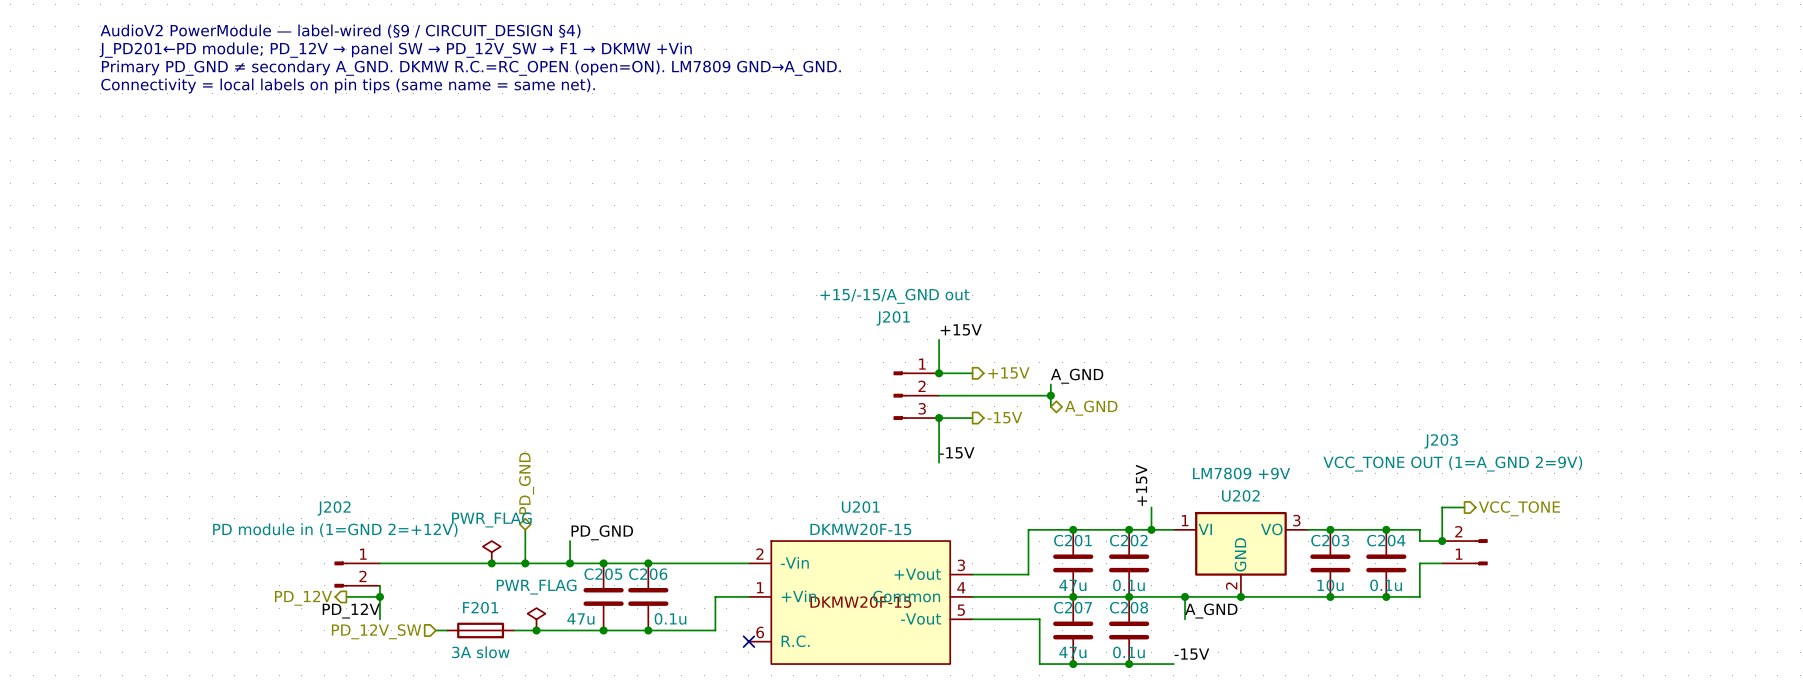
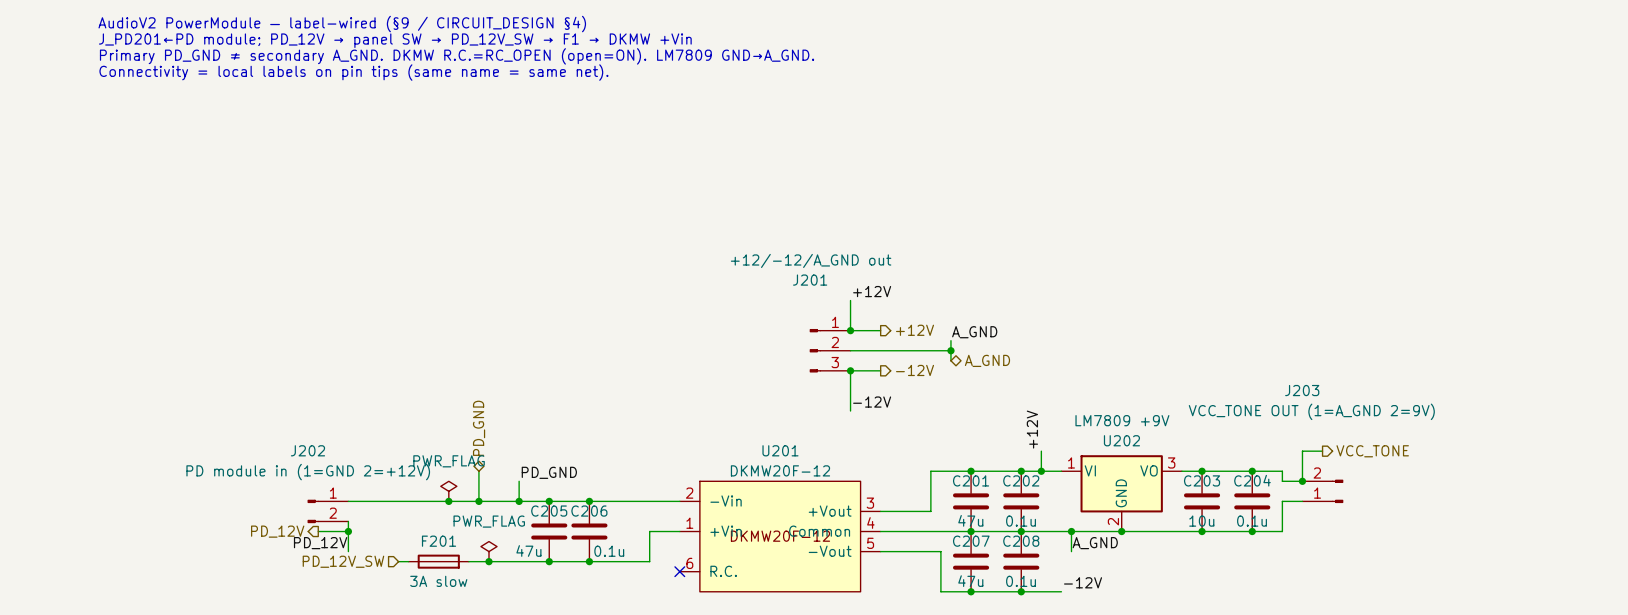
J201 value: +15/-15/A_GND out (894, 296) -> +12/-12/A_GND out (811, 260)
label: +15V (961, 329) -> +12V (872, 291)
hierarchical label: +15V (1008, 373) -> +12V (915, 330)
hierarchical label: -15V (1004, 417) -> -12V (915, 370)
label: -15V (957, 452) -> -12V (872, 402)
label: +15V (1141, 485) -> +12V (1032, 429)
U201 value: DKMW20F-15 (860, 529) -> DKMW20F-12 (780, 470)
U201 text: DKMW20F-15 (860, 602) -> DKMW20F-12 (780, 536)
label: -15V (1191, 654) -> -12V (1083, 582)

